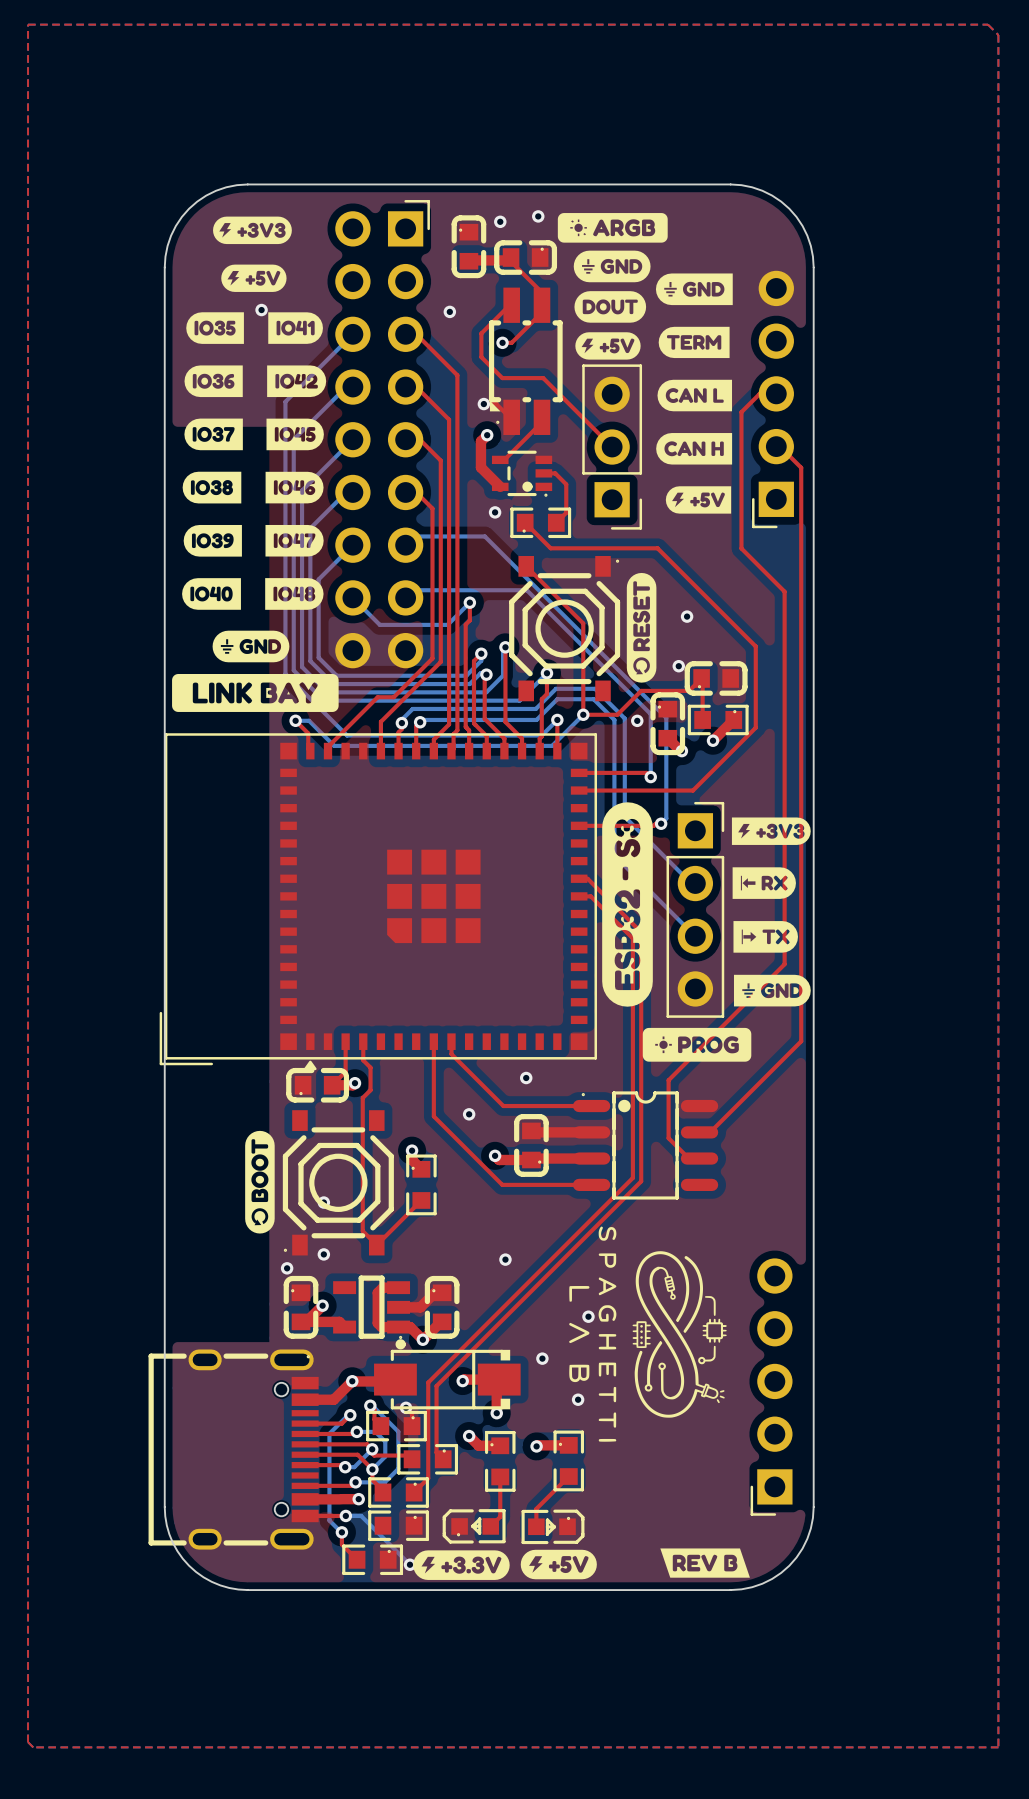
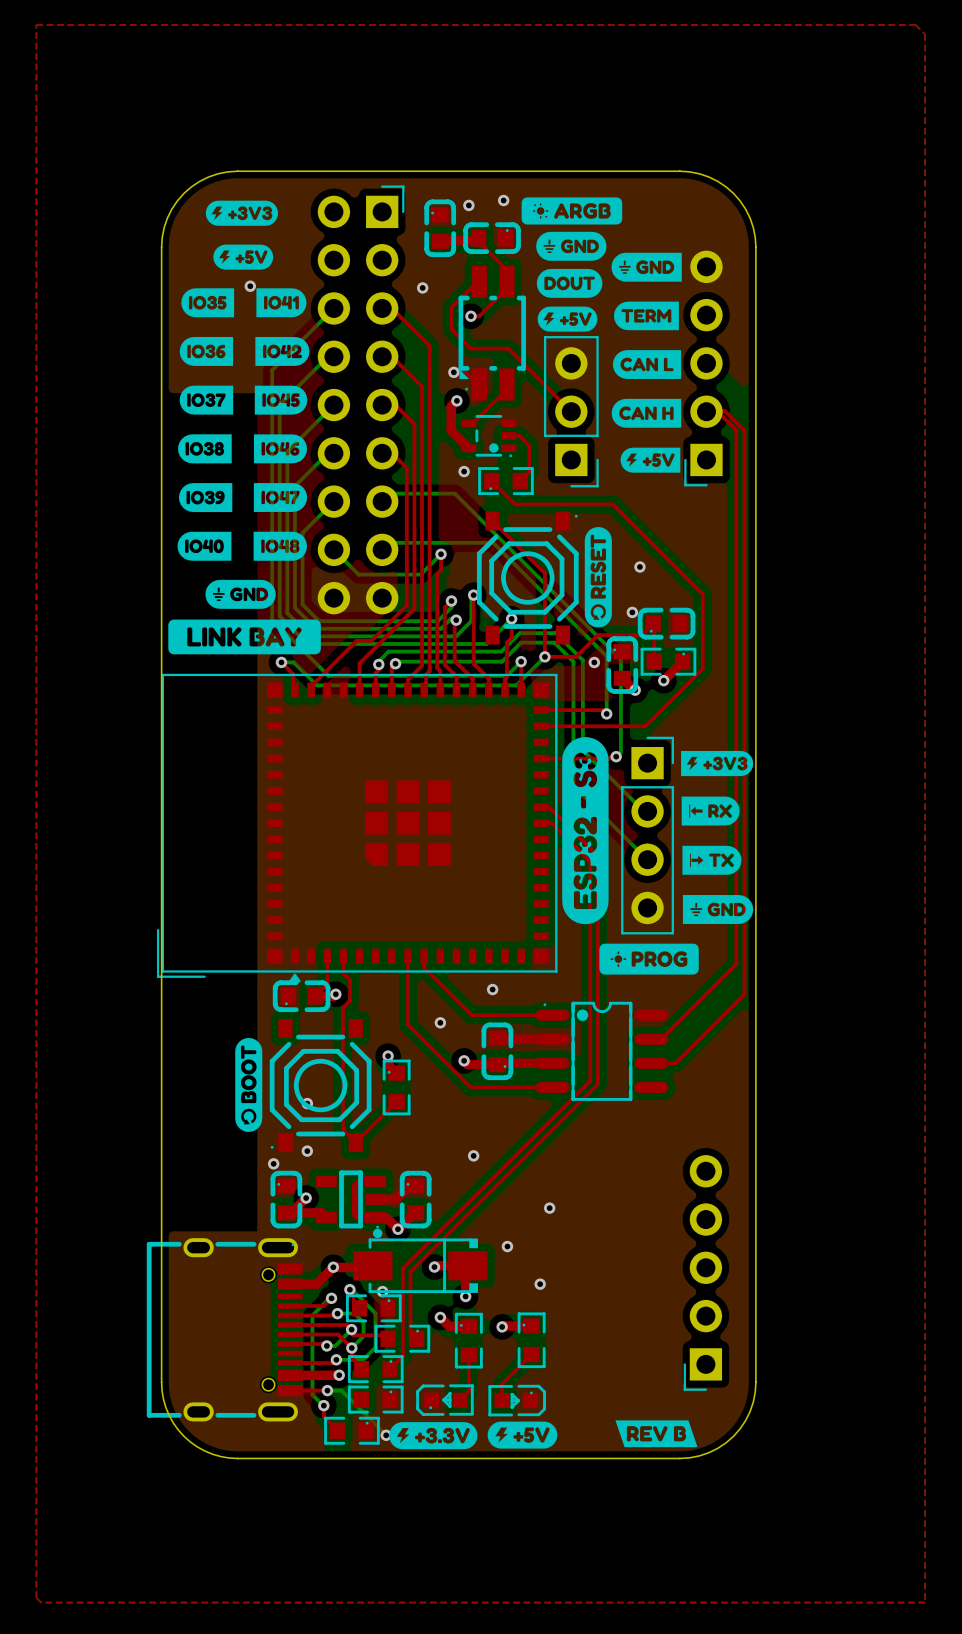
top track: (771, 394) (759, 394) (741, 412) (741, 548) (784, 591) (784, 964) (668, 1080) (668, 1138) (688, 1158) (699, 1158) -> none
part position: (773, 399) -> (703, 368)
top track: none -> (706, 411) (717, 411) (736, 430) (736, 964)
top track: (801, 1041) (792, 1050) -> (744, 955) (744, 994) (675, 1063) (651, 1063)
drawing: [569, 1226, 727, 1442] -> none
part position: (771, 1387) -> (702, 1272)

